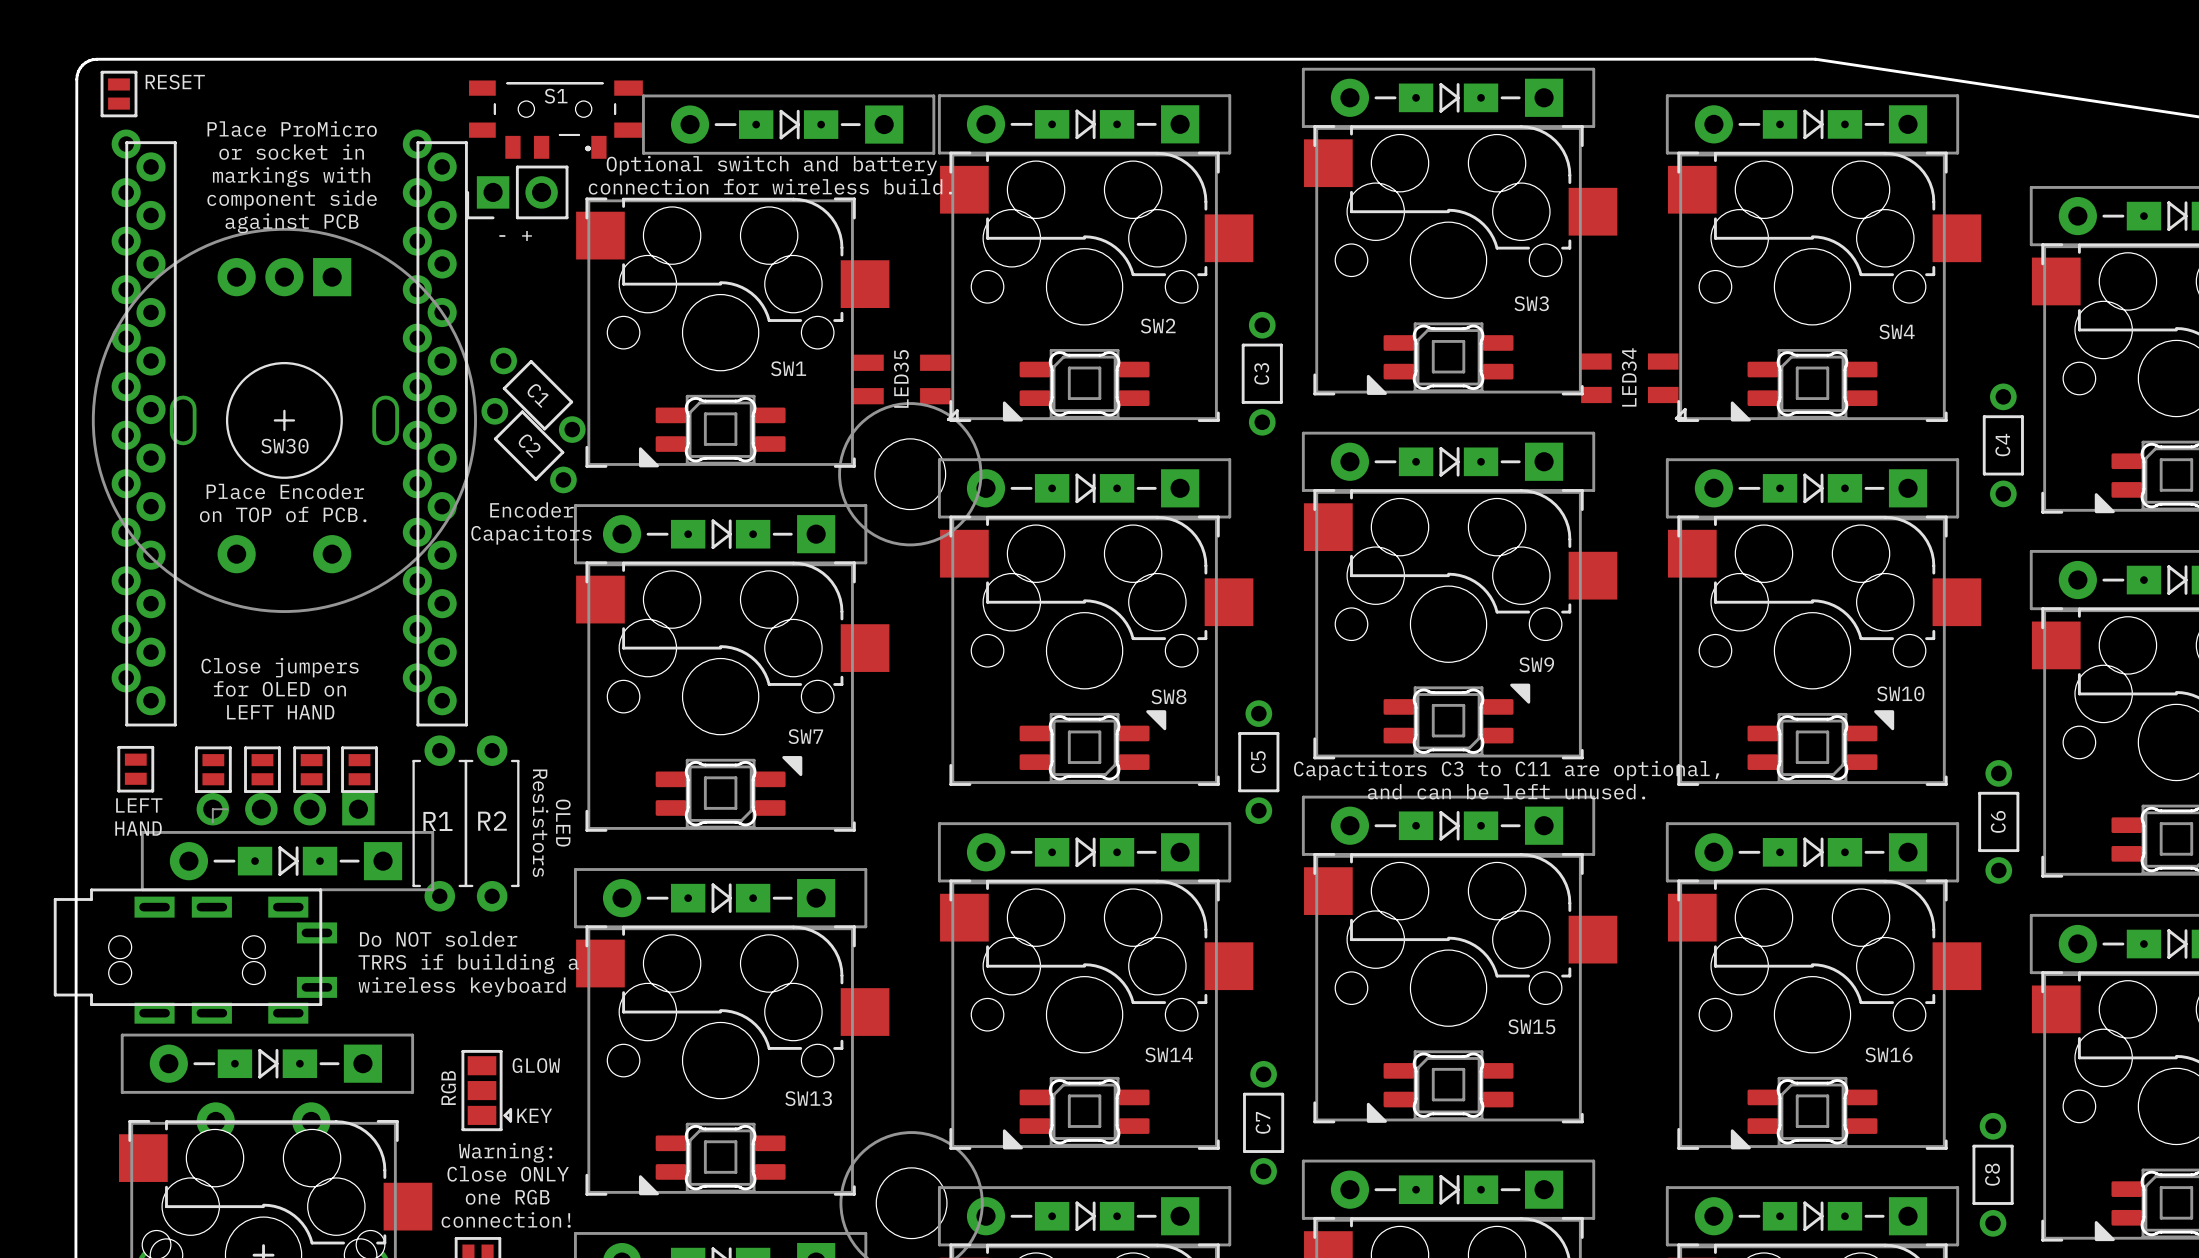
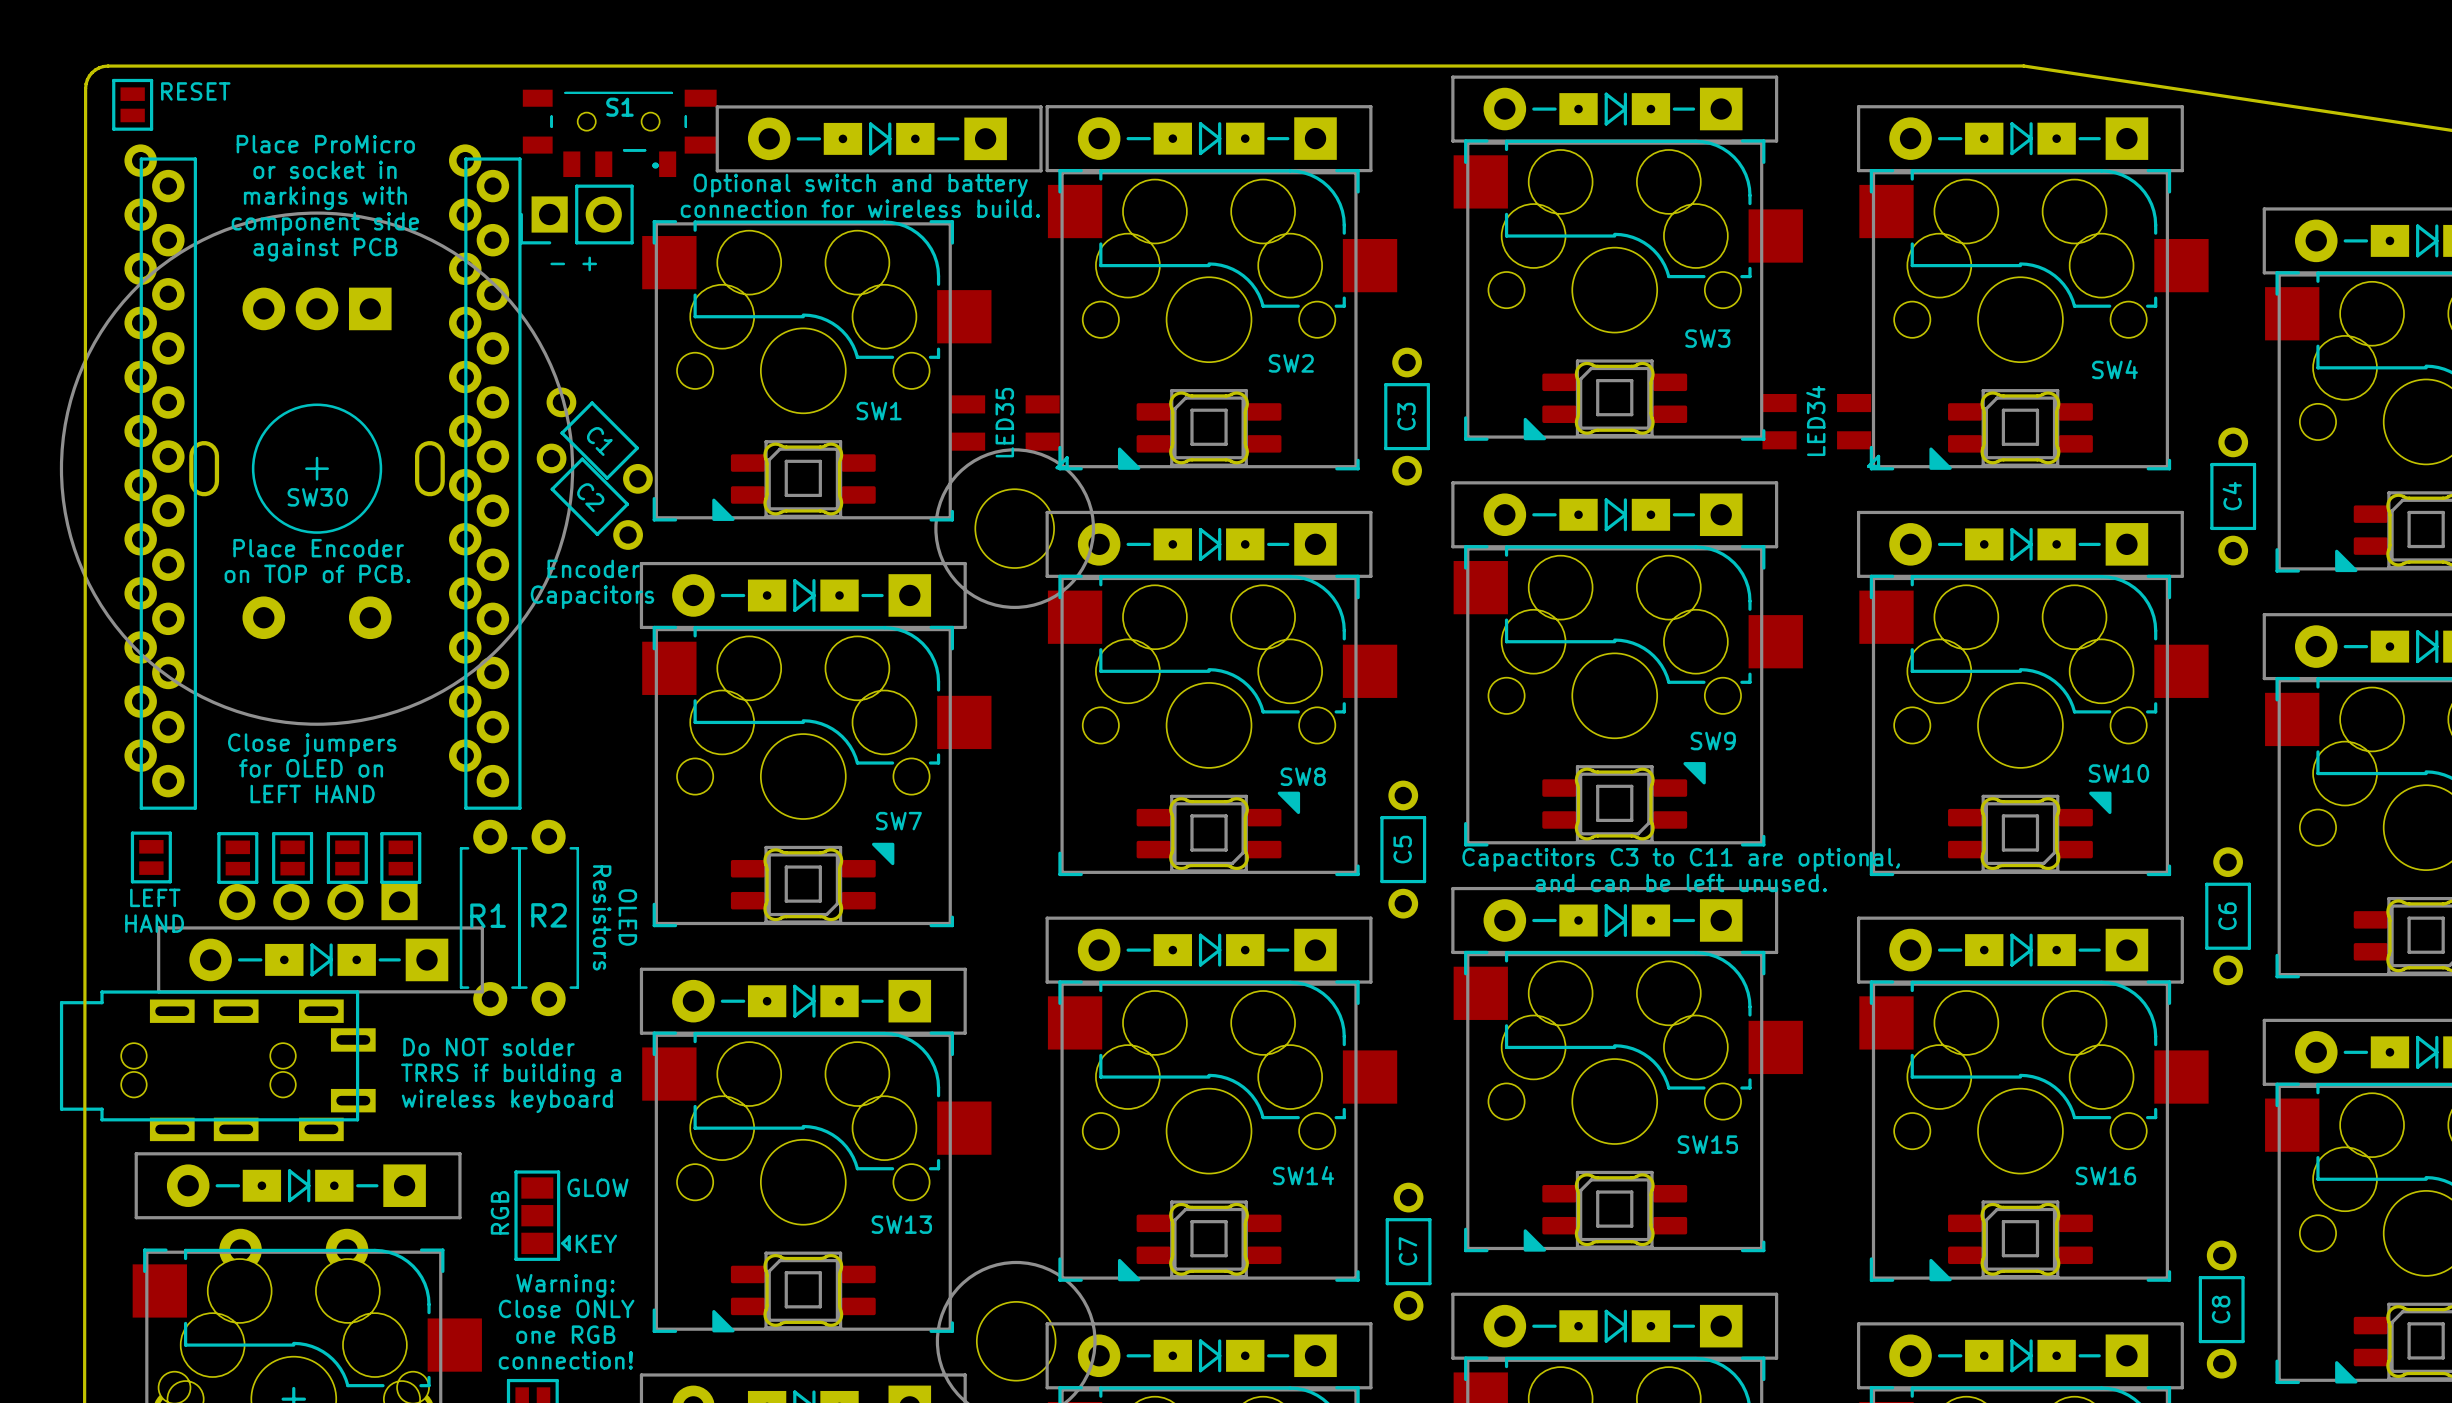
drawing shape: [91, 227, 477, 613] -> [59, 211, 575, 726]
line: (227, 809) (212, 809) (212, 822) -> none

